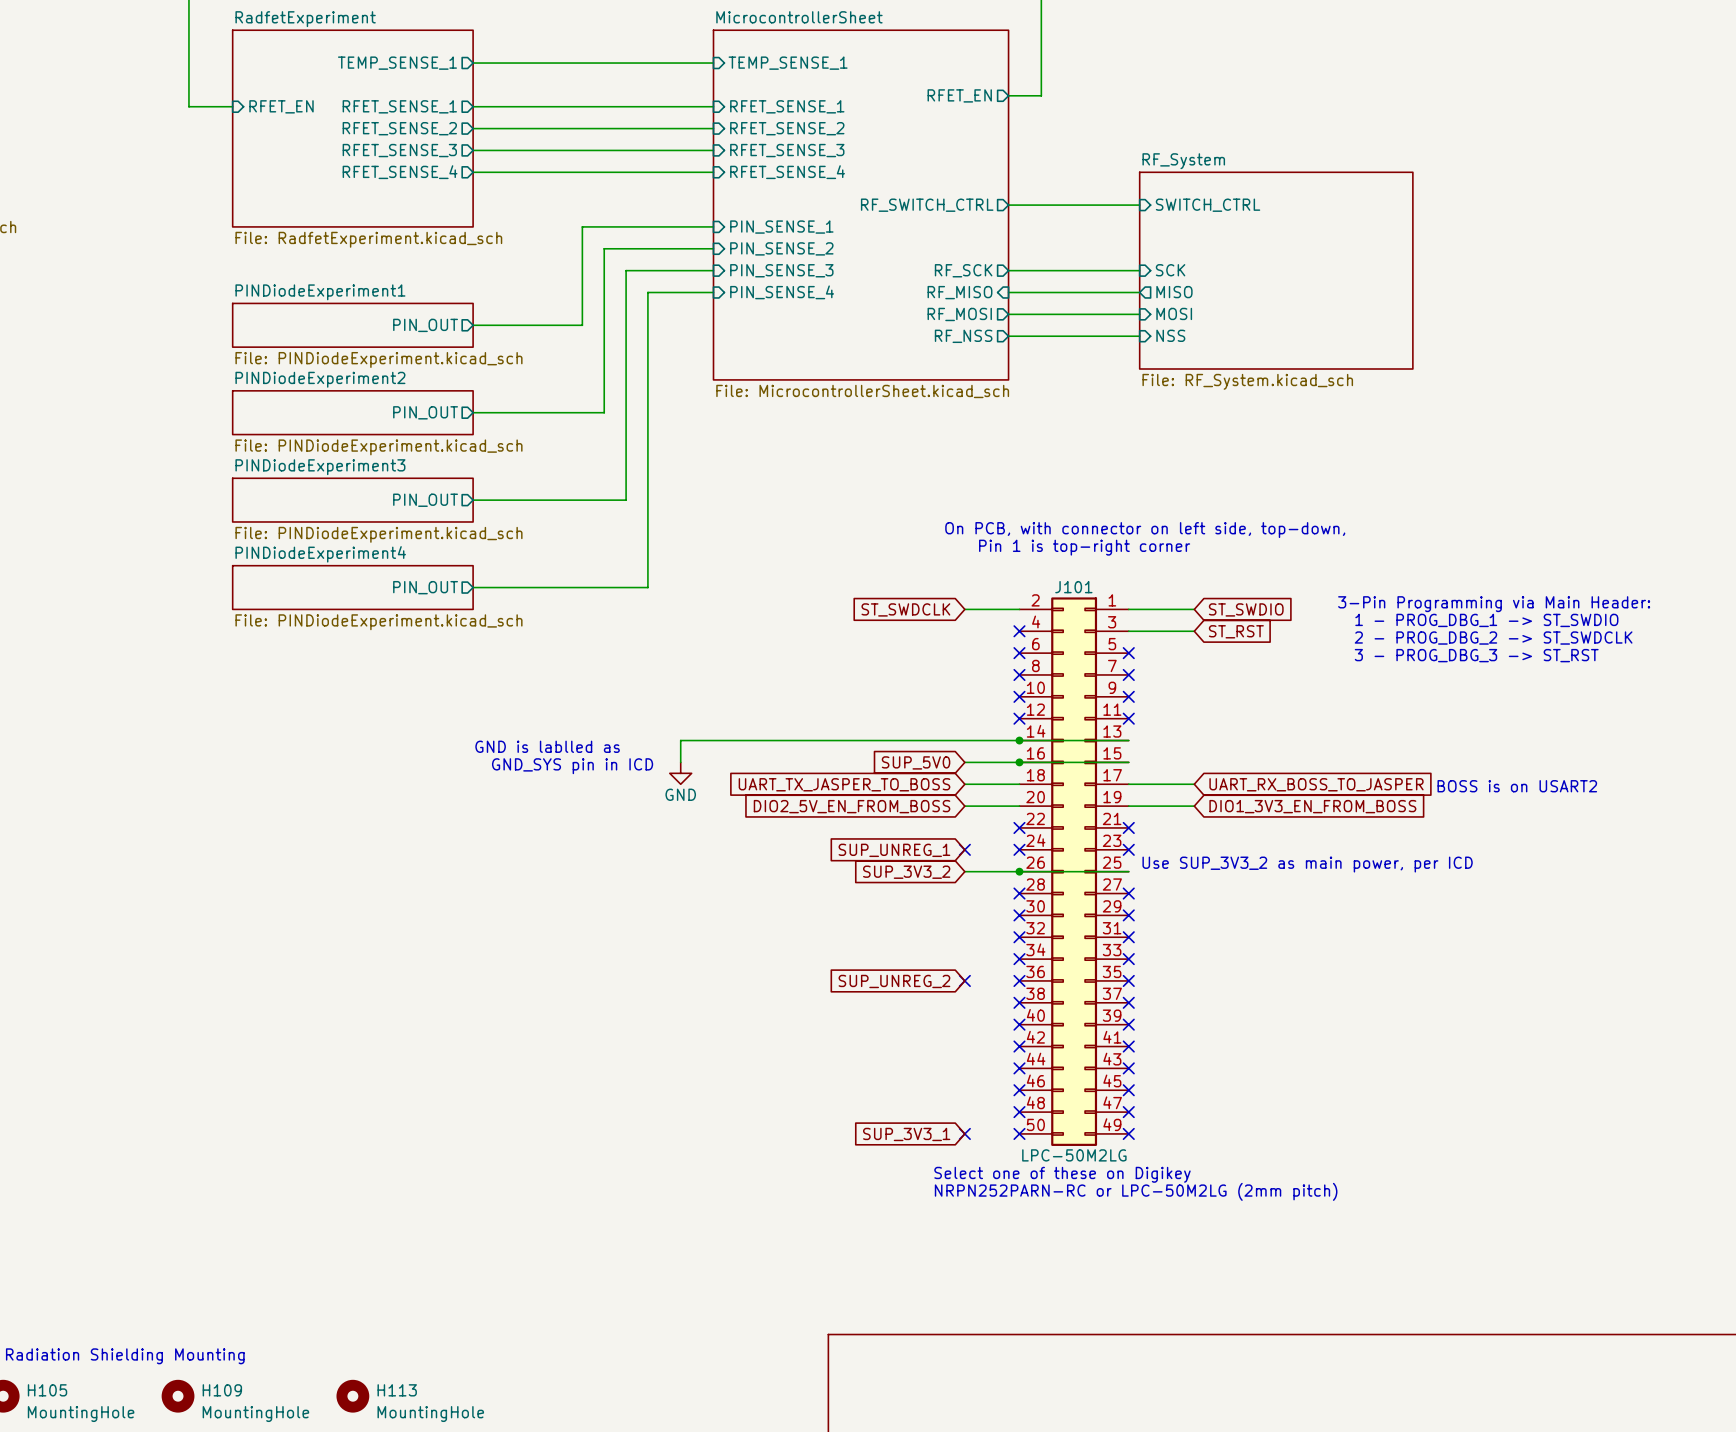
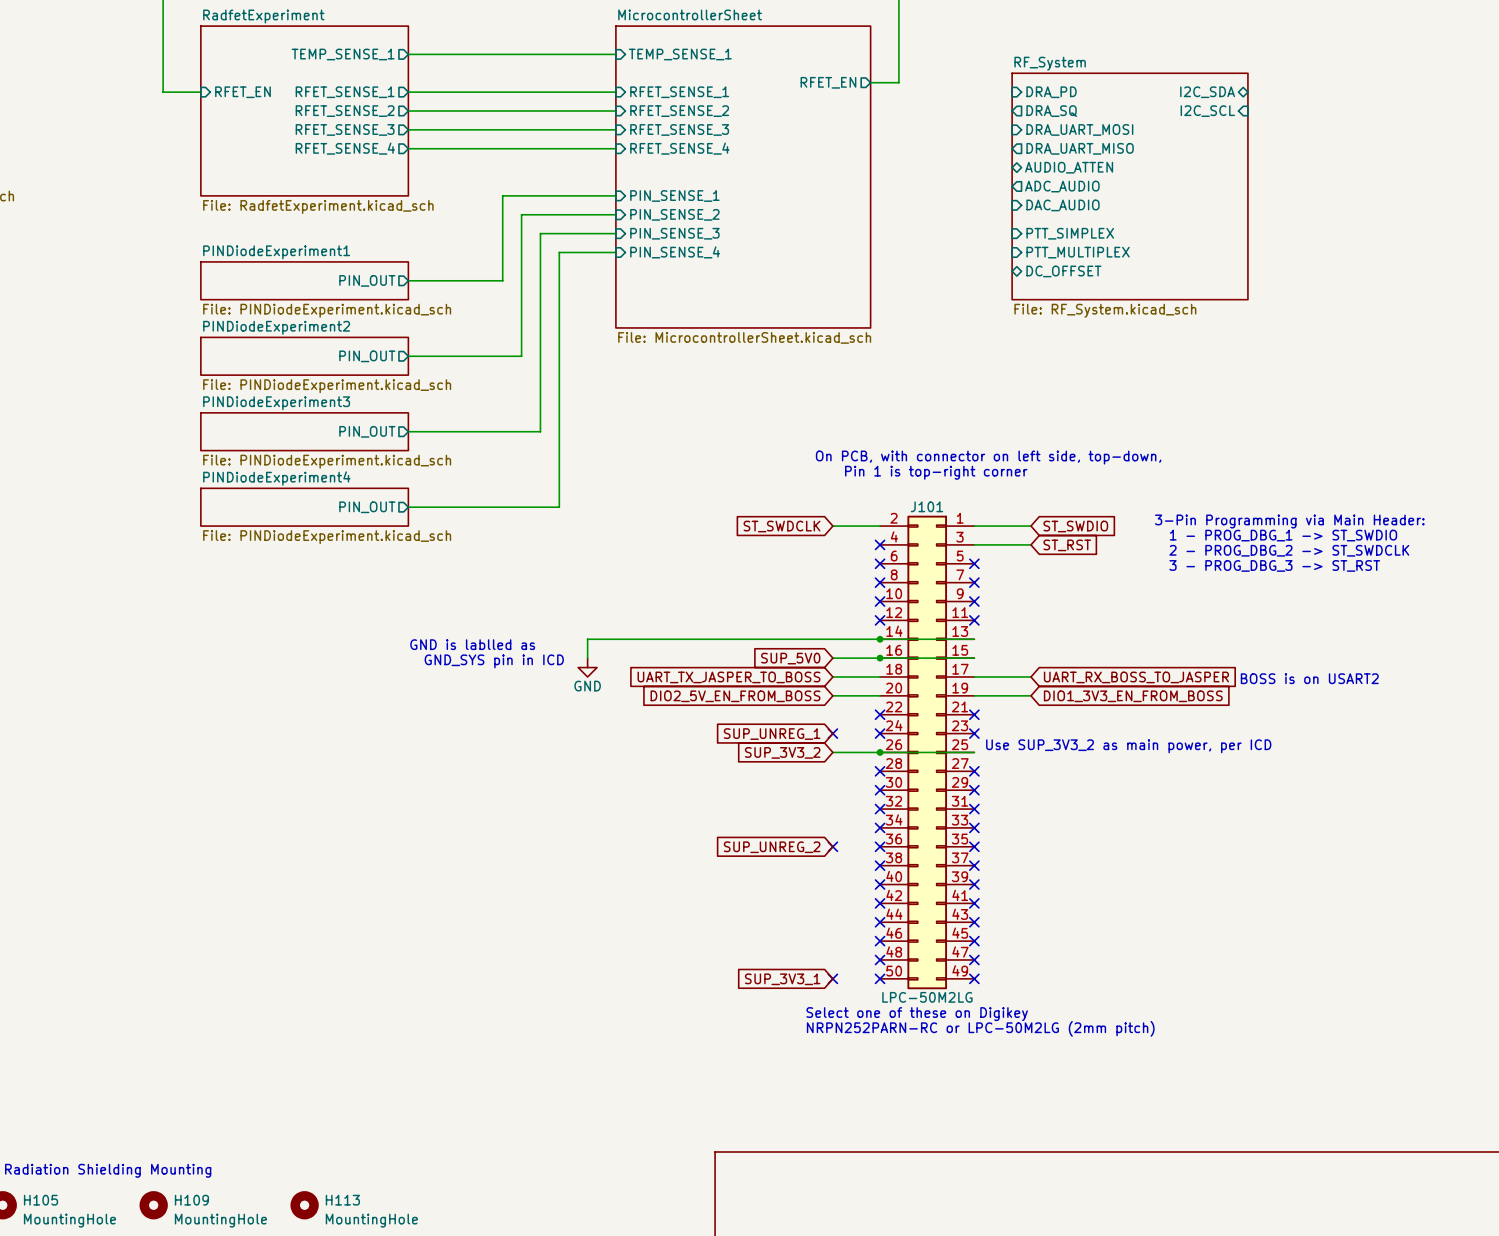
sheet pin: none -> DRA_PD (1051, 92)
sheet pin: none -> I2C_SDA (1207, 92)
sheet pin: none -> DRA_SQ (1051, 111)
sheet pin: none -> I2C_SCL (1207, 111)
sheet pin: none -> DRA_UART_MOSI (1079, 129)
sheet pin: none -> DRA_UART_MISO (1080, 148)
sheet pin: none -> AUDIO_ATTEN (1069, 167)
sheet pin: RF_SWITCH_CTRL (927, 205) -> none
wire: (1008, 205) (1139, 205) -> none
sheet pin: SWITCH_CTRL (1208, 205) -> none
sheet pin: none -> ADC_AUDIO (1062, 186)
sheet RF_System: none -> File: RF_System.kicad_sch (1130, 186)
sheet pin: none -> DAC_AUDIO (1063, 205)
sheet pin: RF_SCK (963, 270) -> none
wire: (1008, 270) (1139, 270) -> none
sheet pin: SCK (1170, 270) -> none
sheet pin: none -> PTT_SIMPLEX (1070, 233)
sheet RF_System: File: RF_System.kicad_sch (1276, 270) -> none
sheet pin: RF_MISO (959, 292) -> none
wire: (1008, 292) (1139, 292) -> none
sheet pin: MISO (1174, 292) -> none
sheet pin: none -> PTT_MULTIPLEX (1078, 252)
sheet pin: MOSI (1174, 313) -> none
sheet pin: RF_MOSI (959, 314) -> none
wire: (1008, 314) (1139, 314) -> none
sheet pin: none -> DC_OFFSET (1063, 271)
sheet pin: NSS (1170, 335) -> none
sheet pin: RF_NSS (963, 336) -> none
wire: (1008, 336) (1139, 336) -> none

